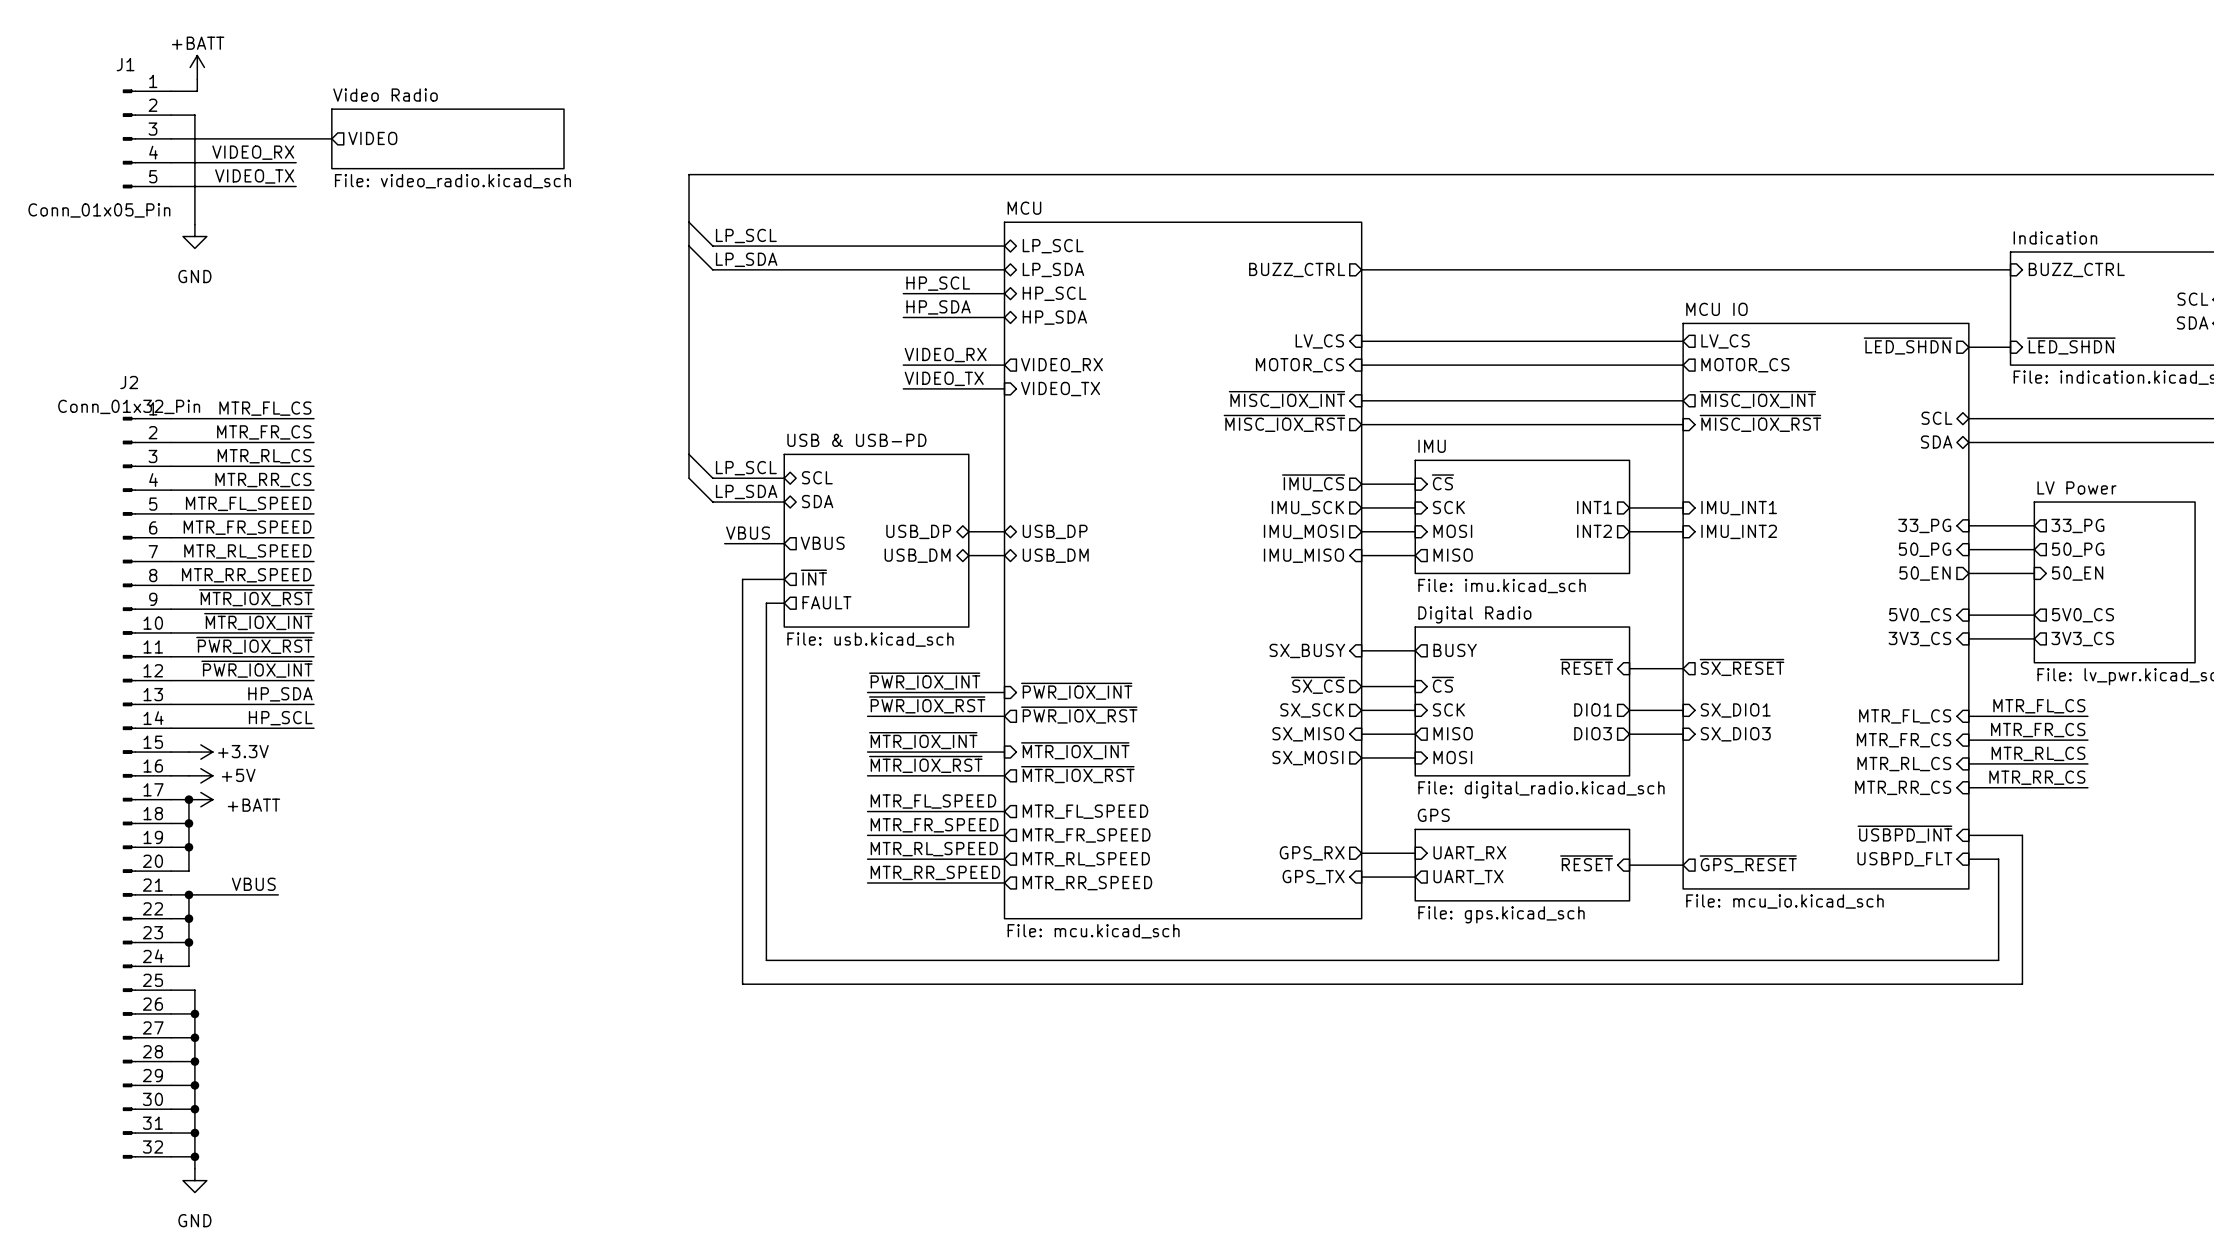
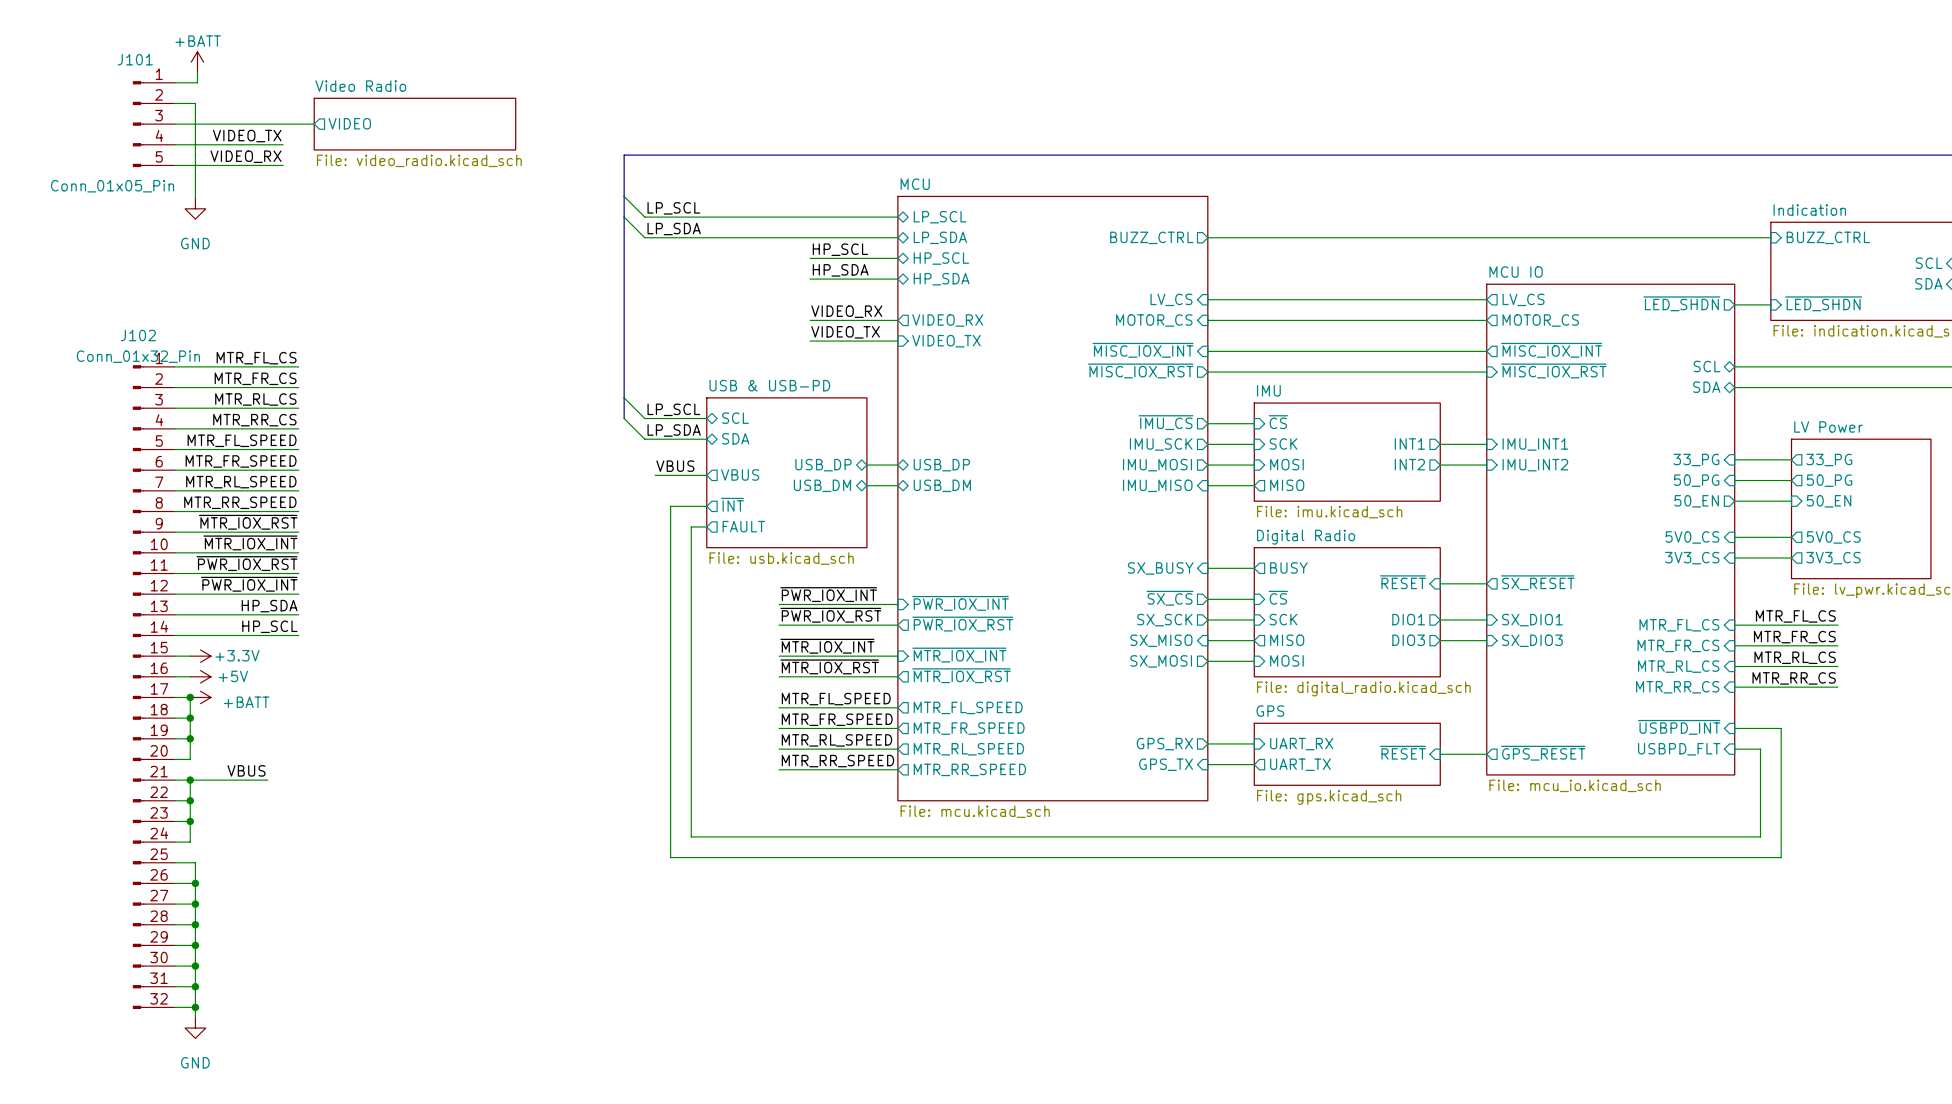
J1 name: J1 (125, 64) -> J101 (135, 59)
label: VIDEO_RX (253, 152) -> VIDEO_TX (247, 136)
label: VIDEO_TX (254, 176) -> VIDEO_RX (246, 156)
J2 name: J2 (129, 382) -> J102 (138, 335)

